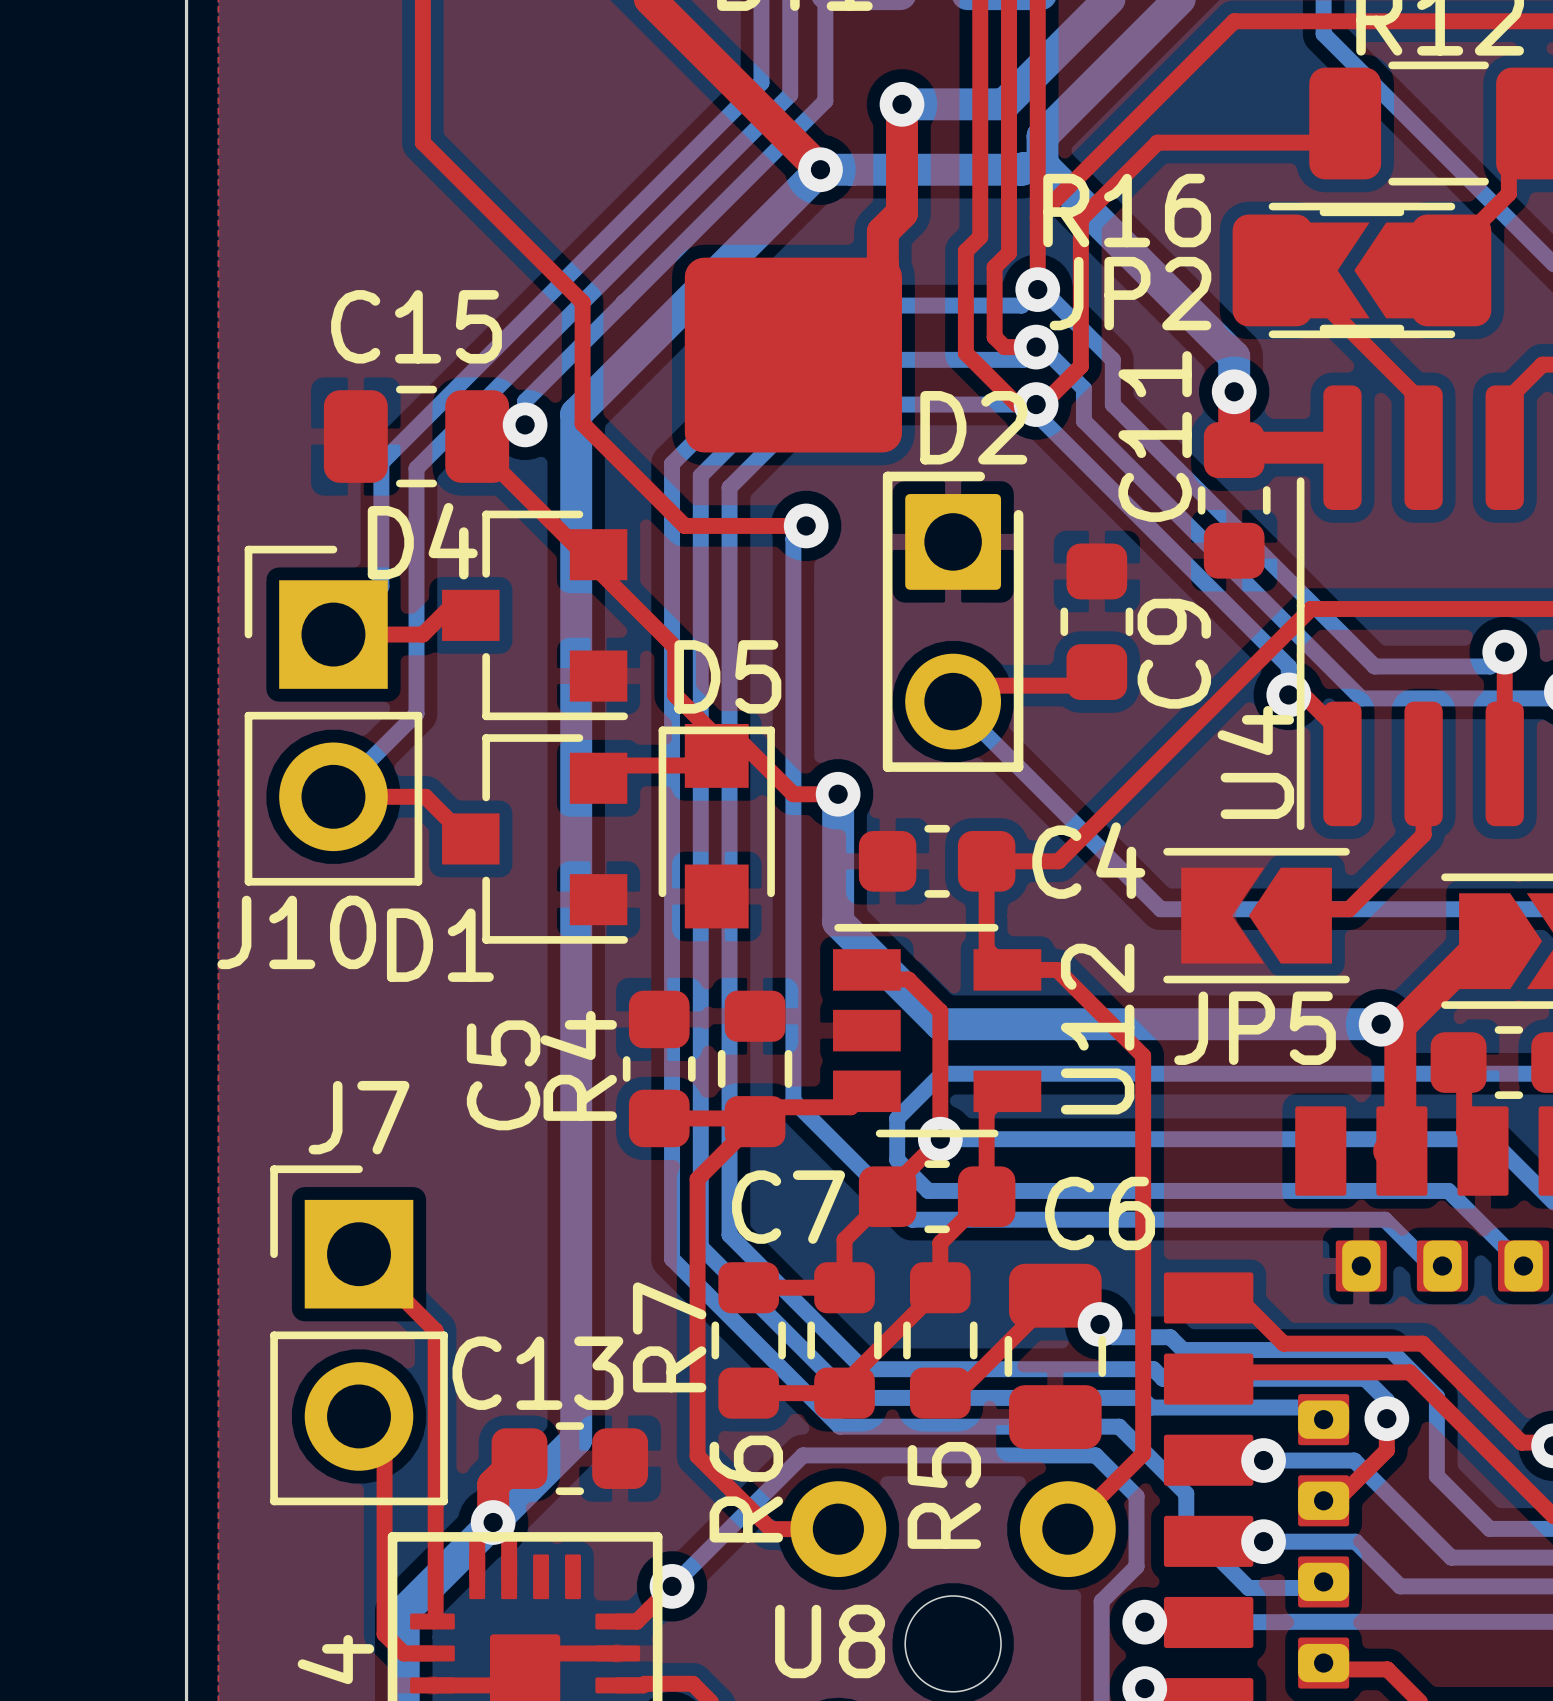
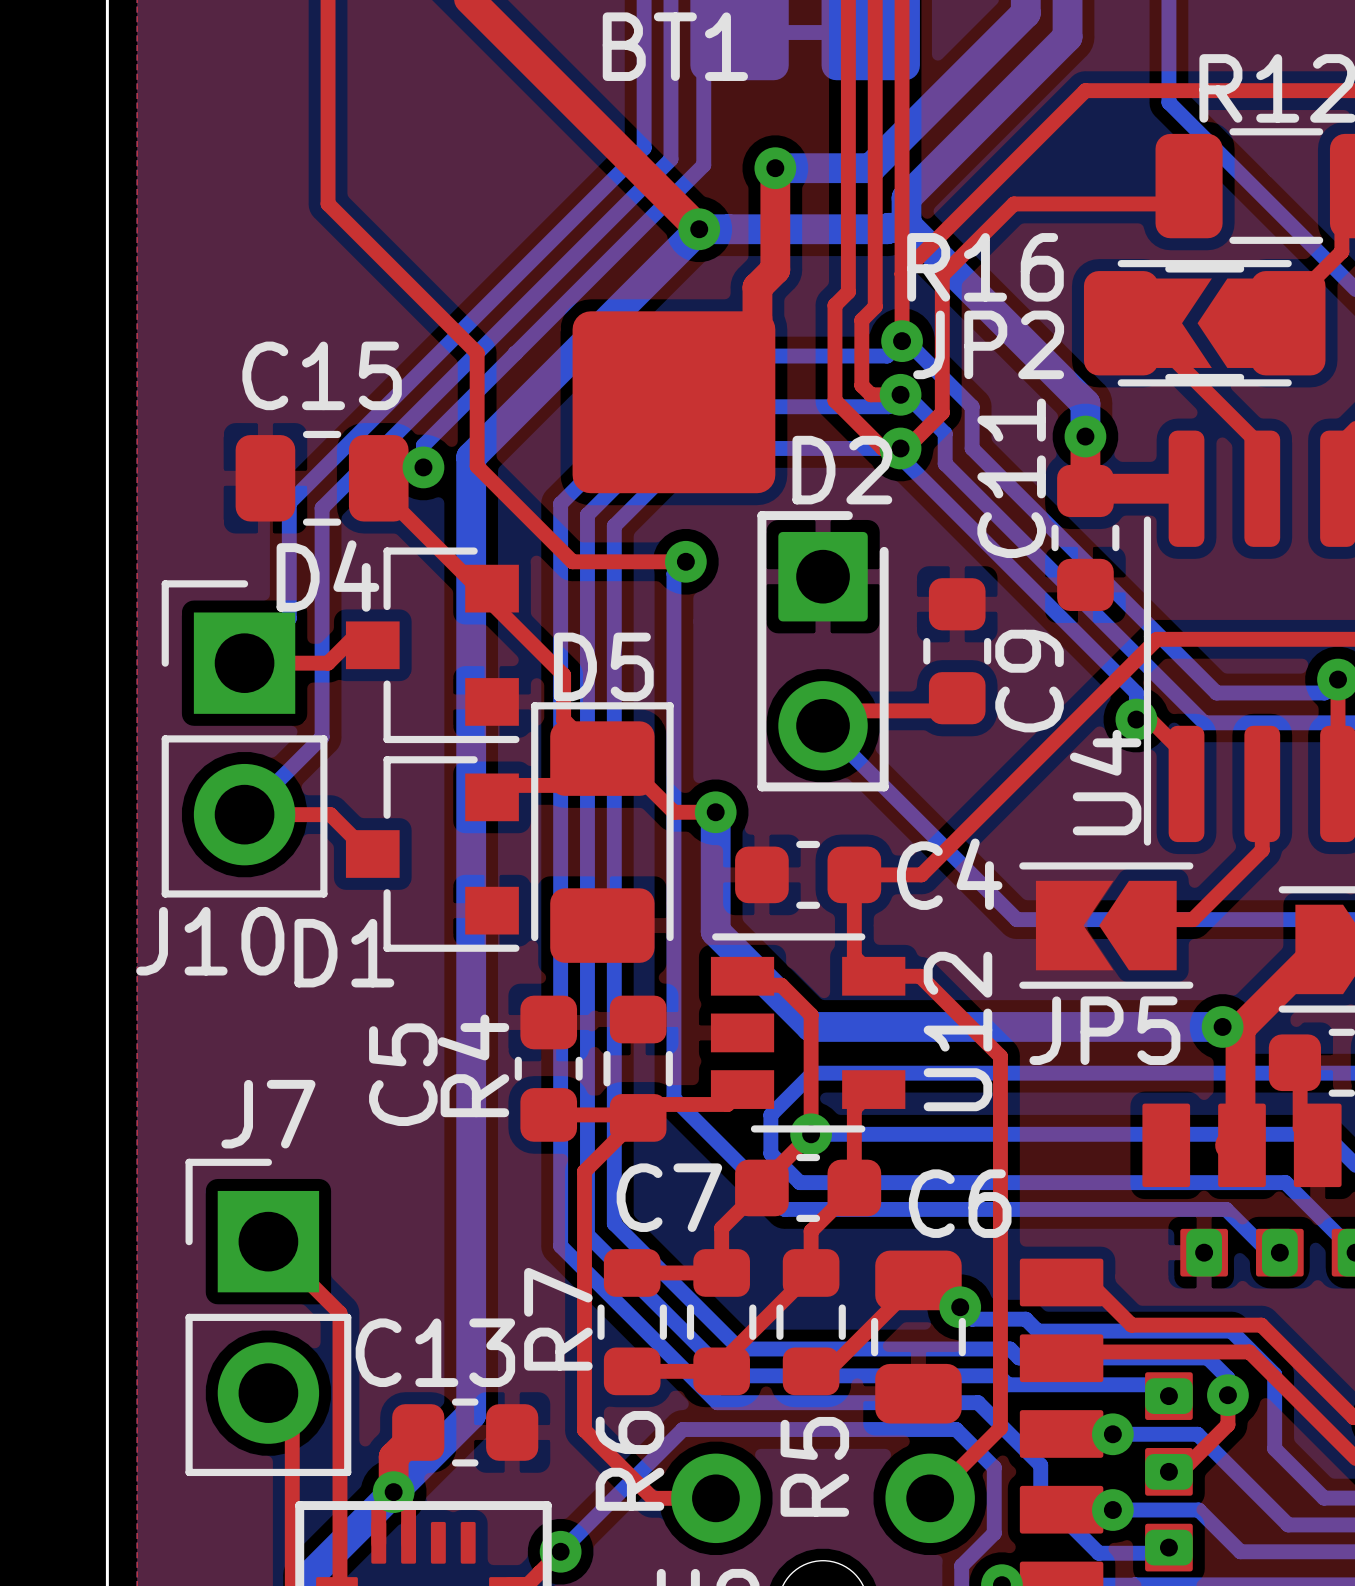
D5 name position: D5 (727, 676) -> D5 (603, 666)
D5 footprint: [658, 723, 775, 929] -> [531, 702, 674, 963]

